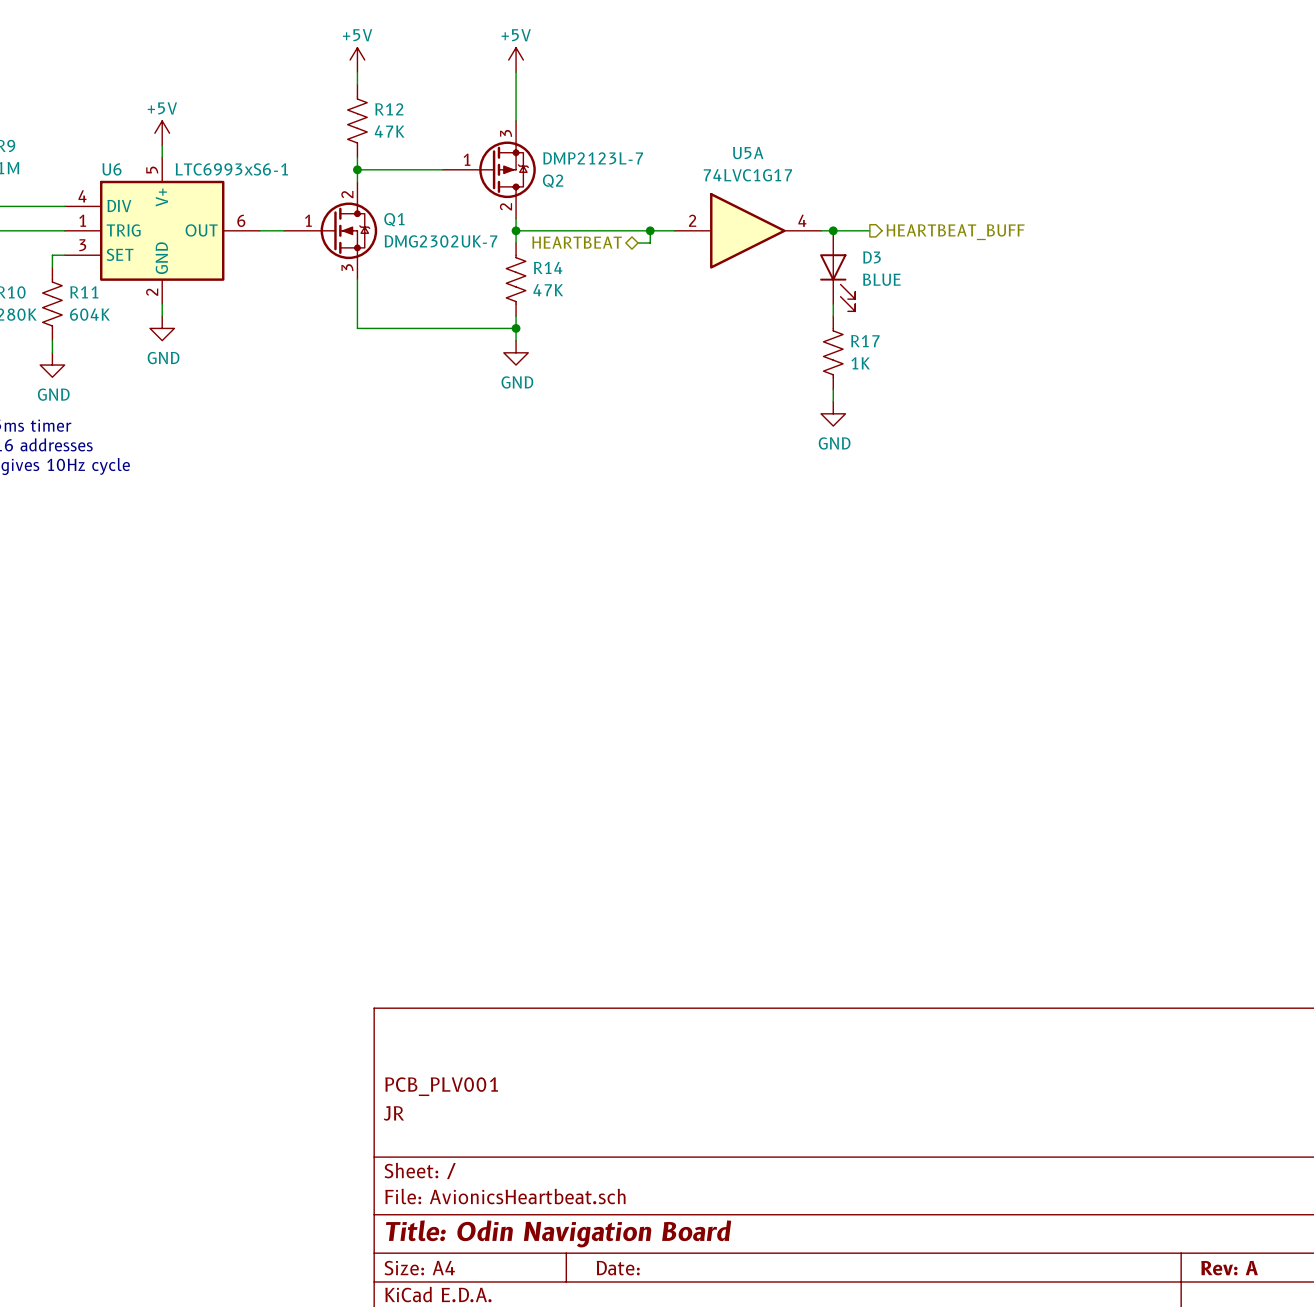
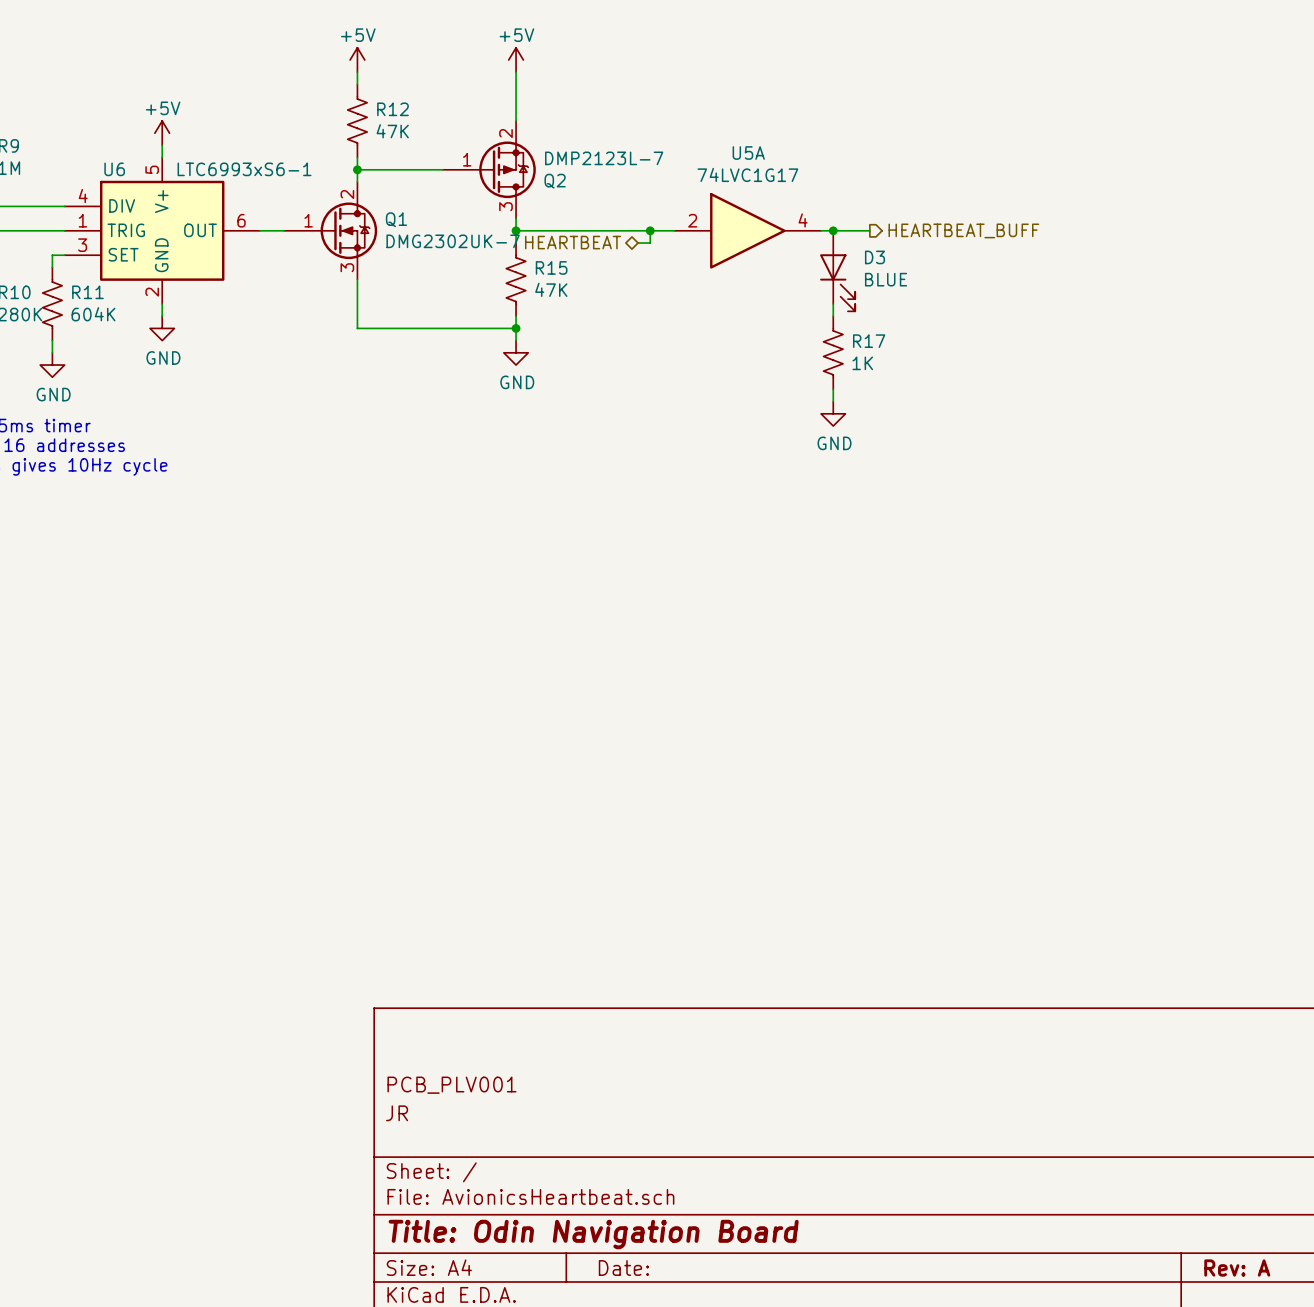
Q2 pin number: 3 (506, 133) -> 2 (505, 133)
Q2 pin number: 2 (505, 206) -> 3 (505, 206)
R14 name: R14 (548, 267) -> R15 (551, 267)

